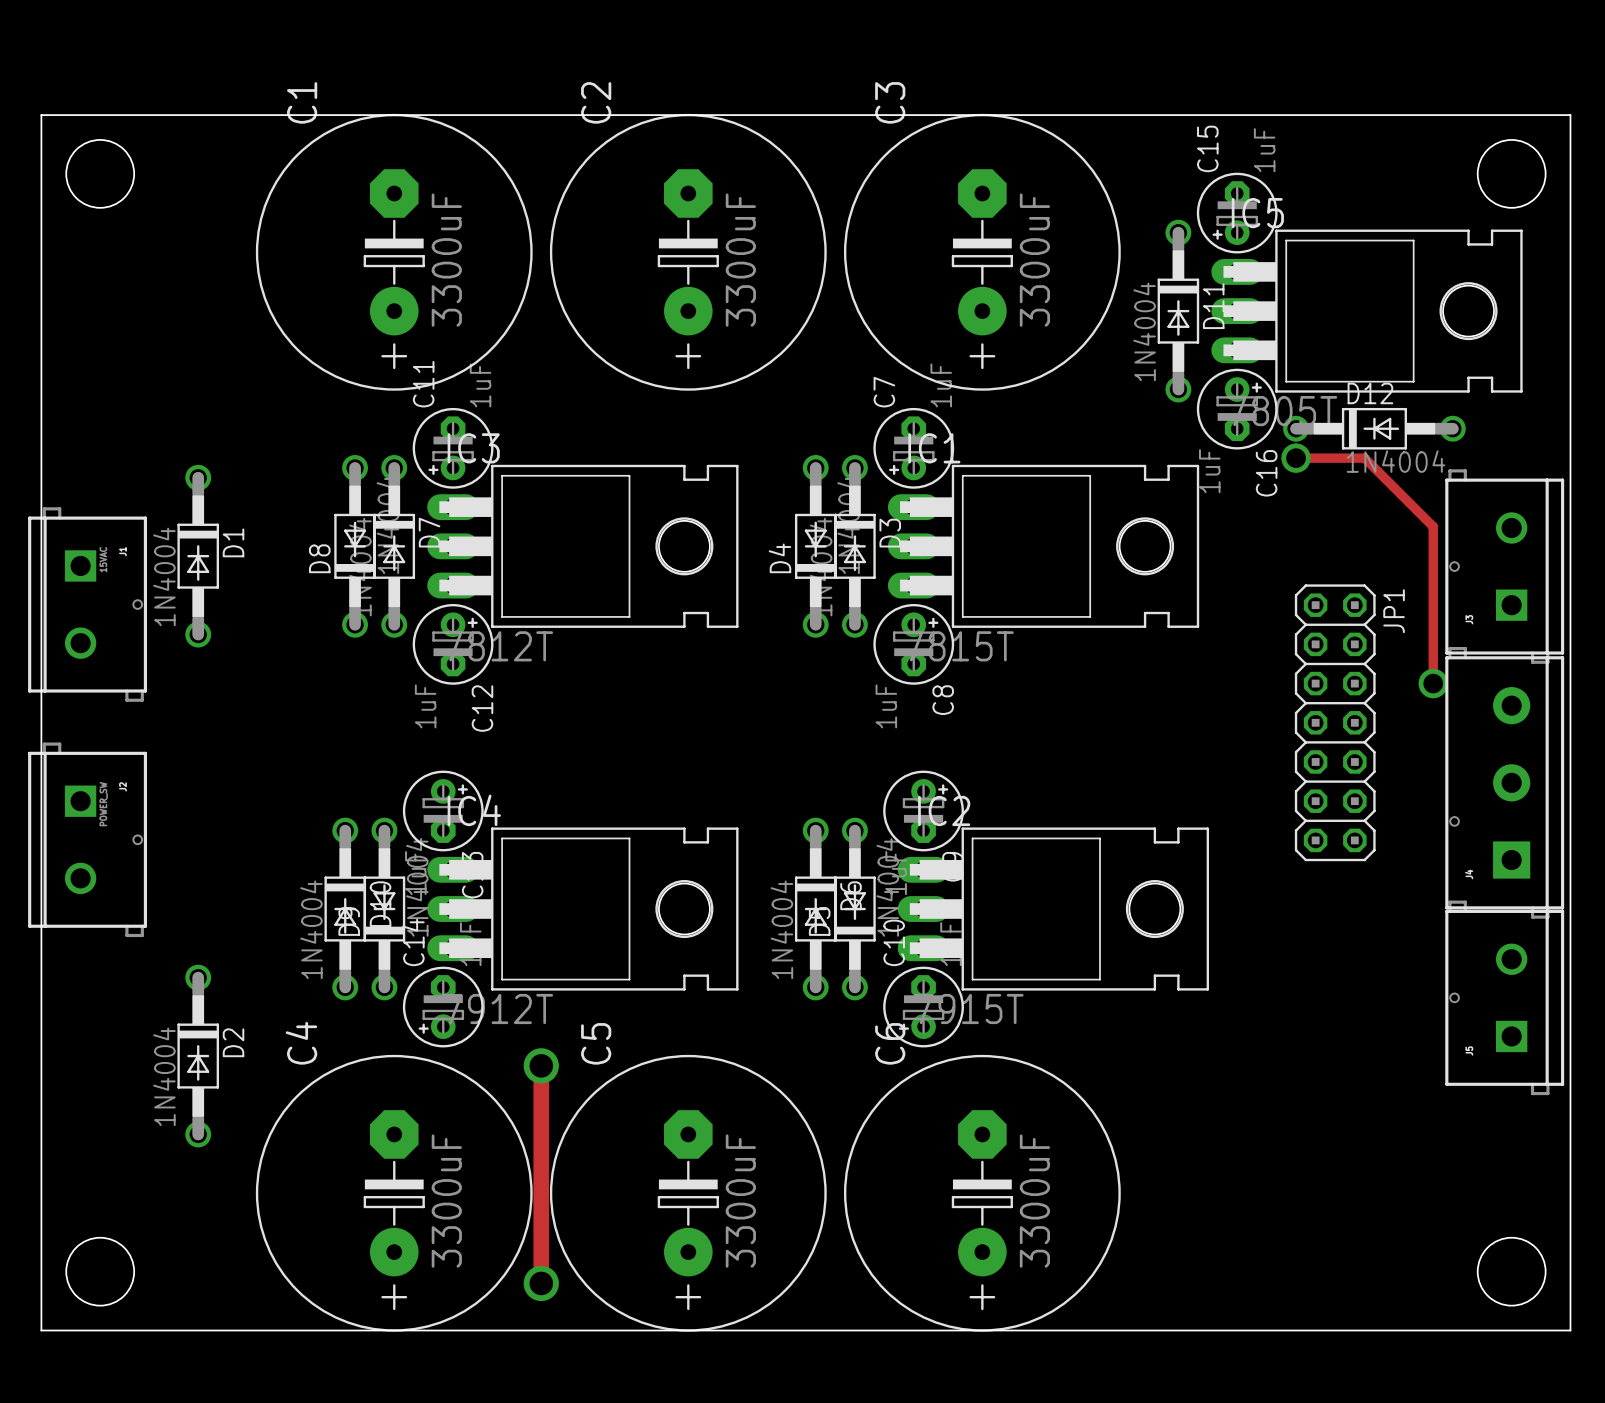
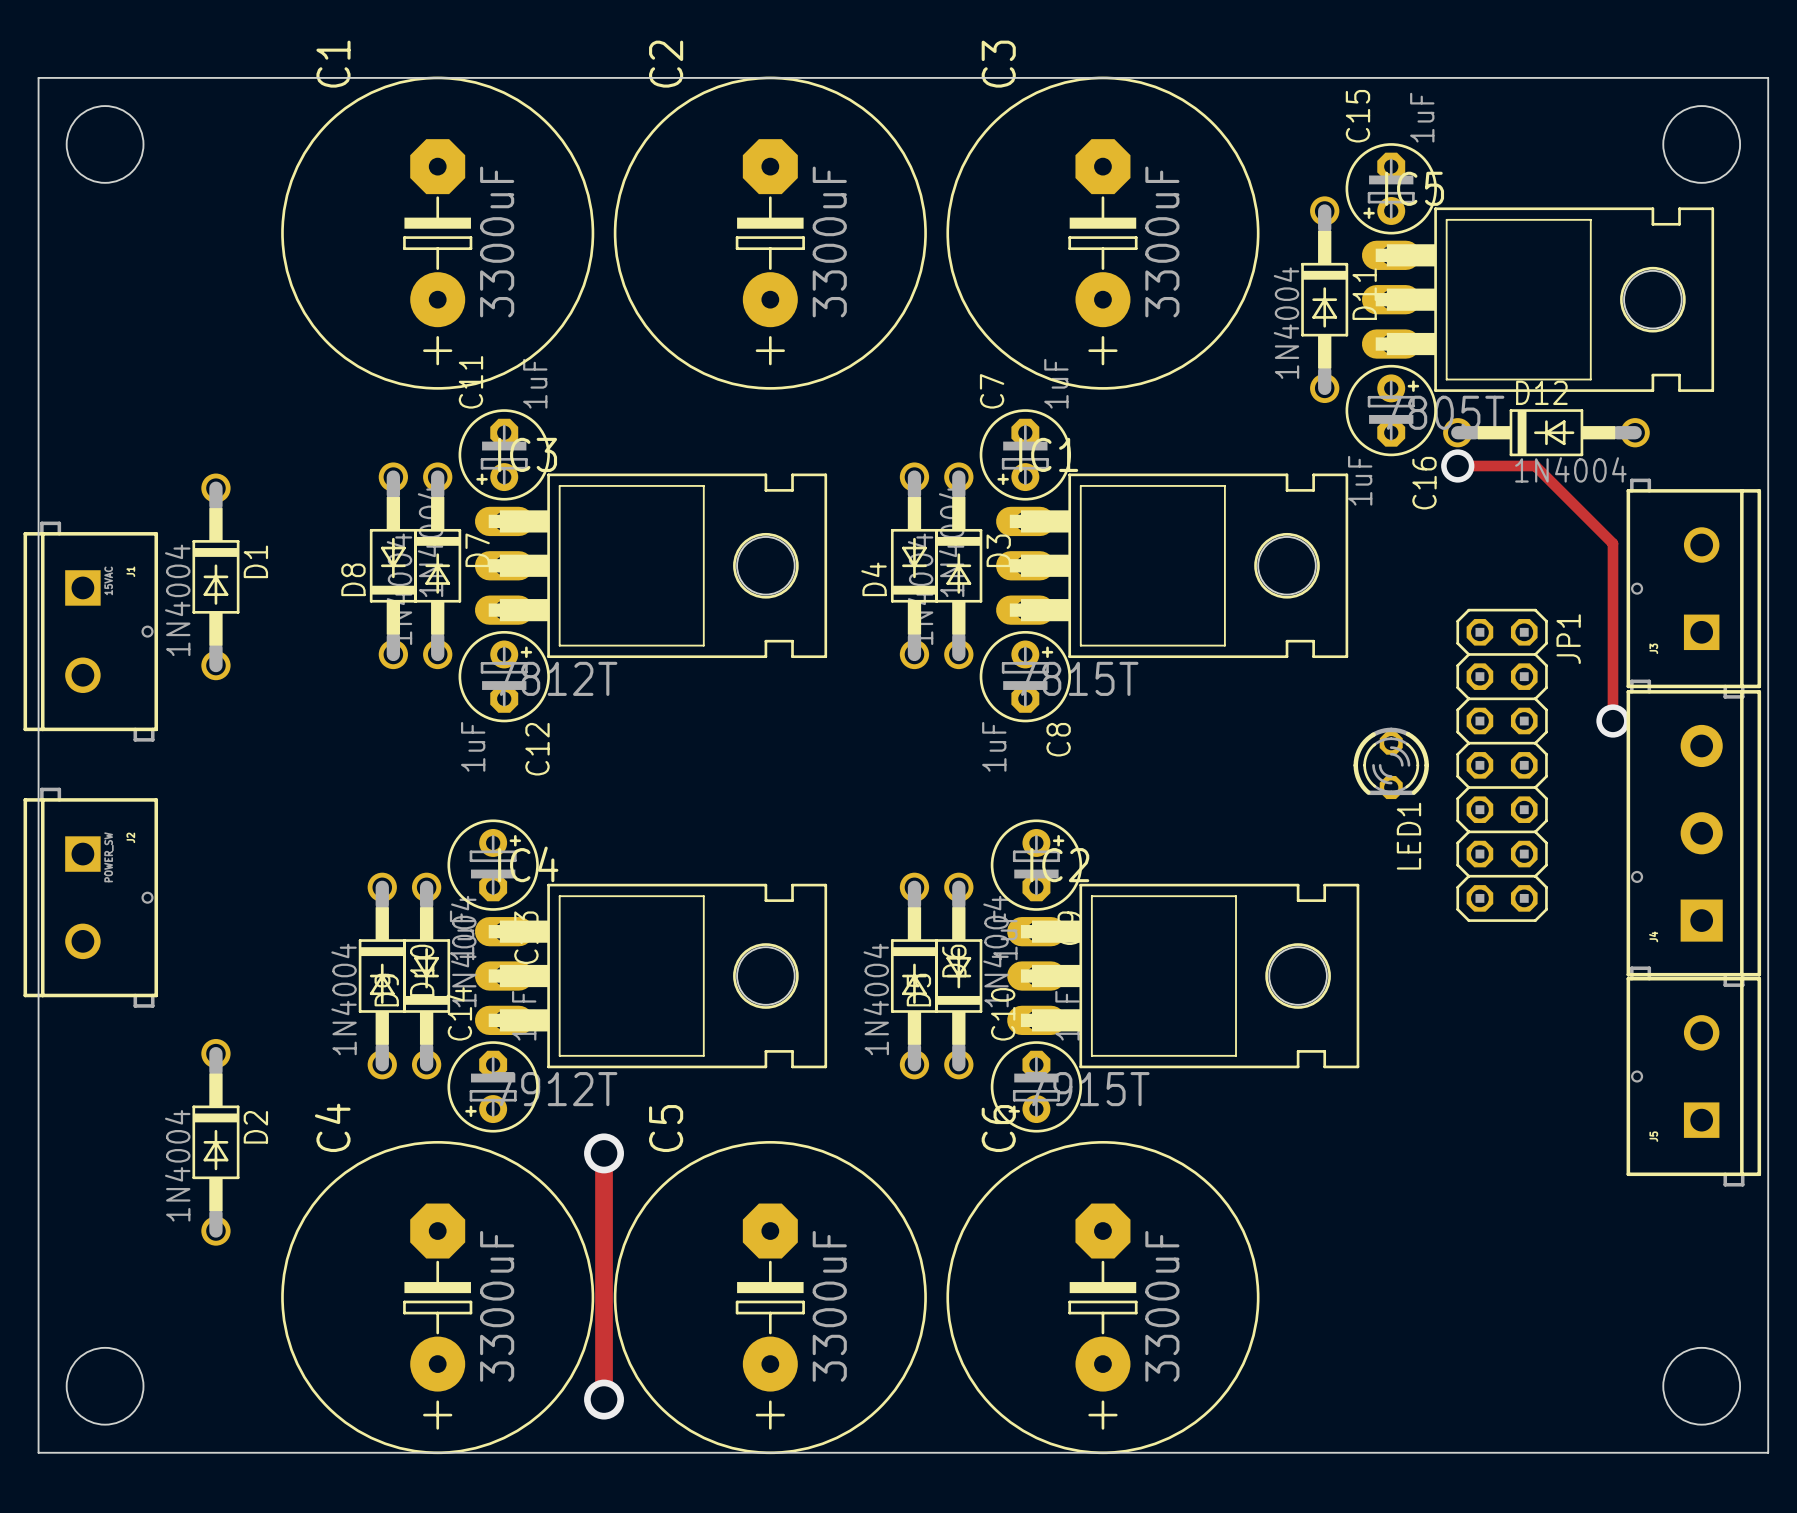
LED1: none -> (1391, 763)

